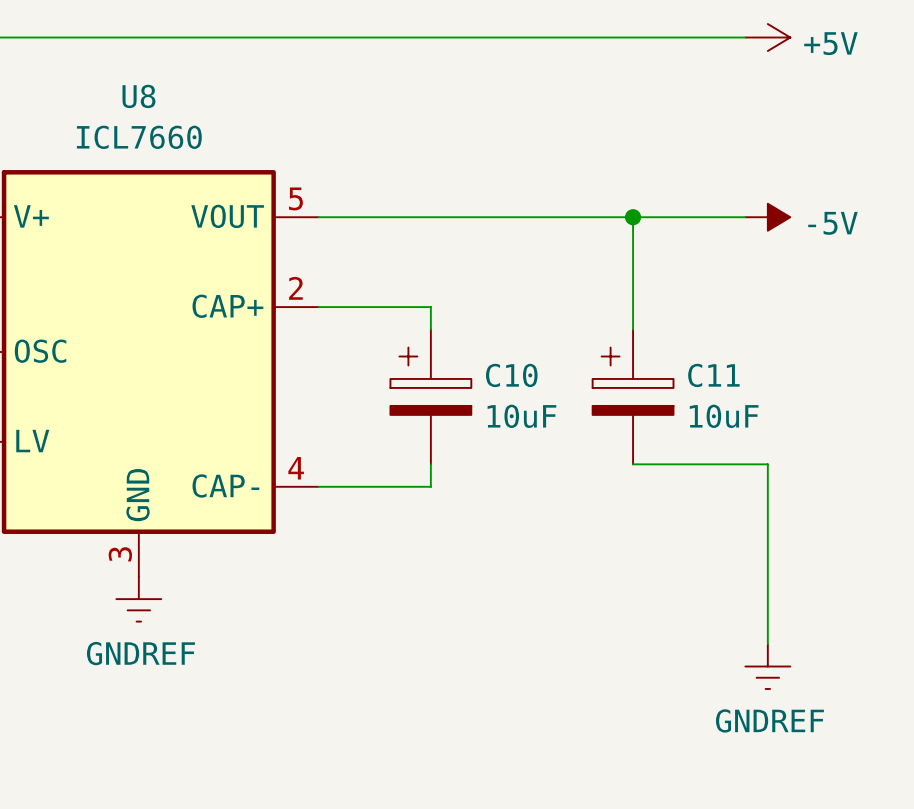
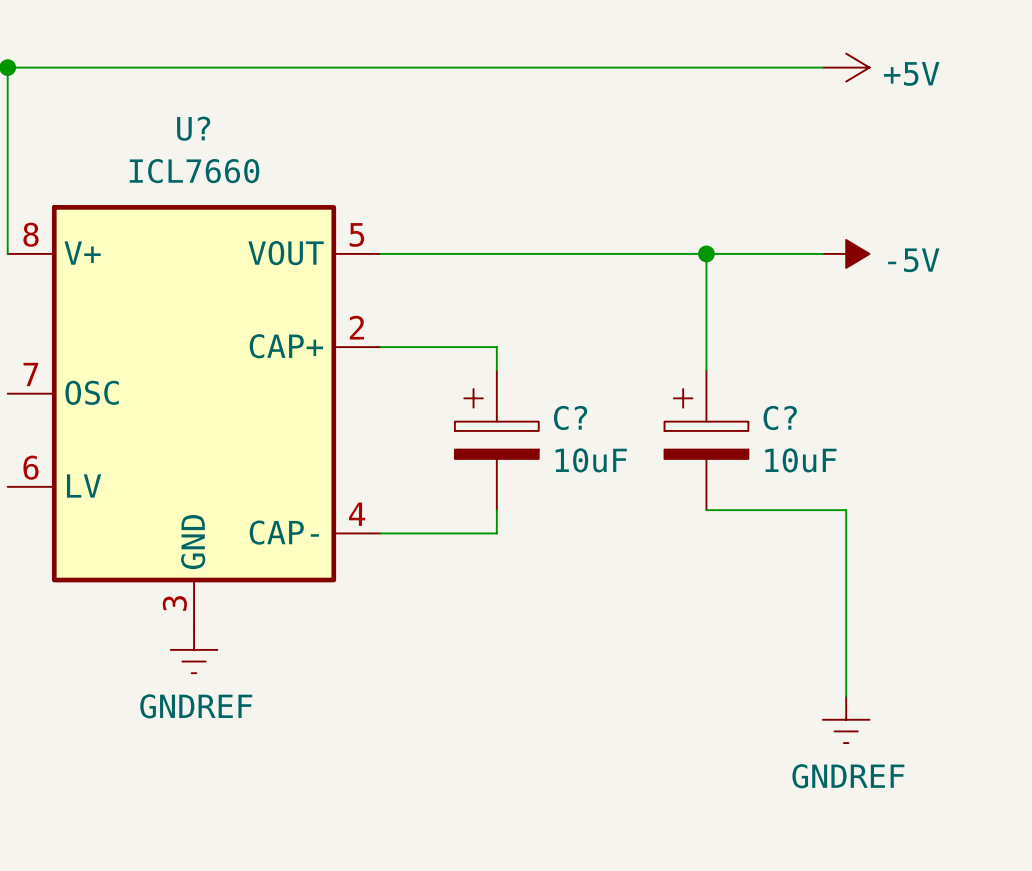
U8 name: U8 (138, 96) -> U? (193, 128)
C10 name: C10 (511, 375) -> C? (570, 417)
C11 name: C11 (713, 375) -> C? (780, 417)

